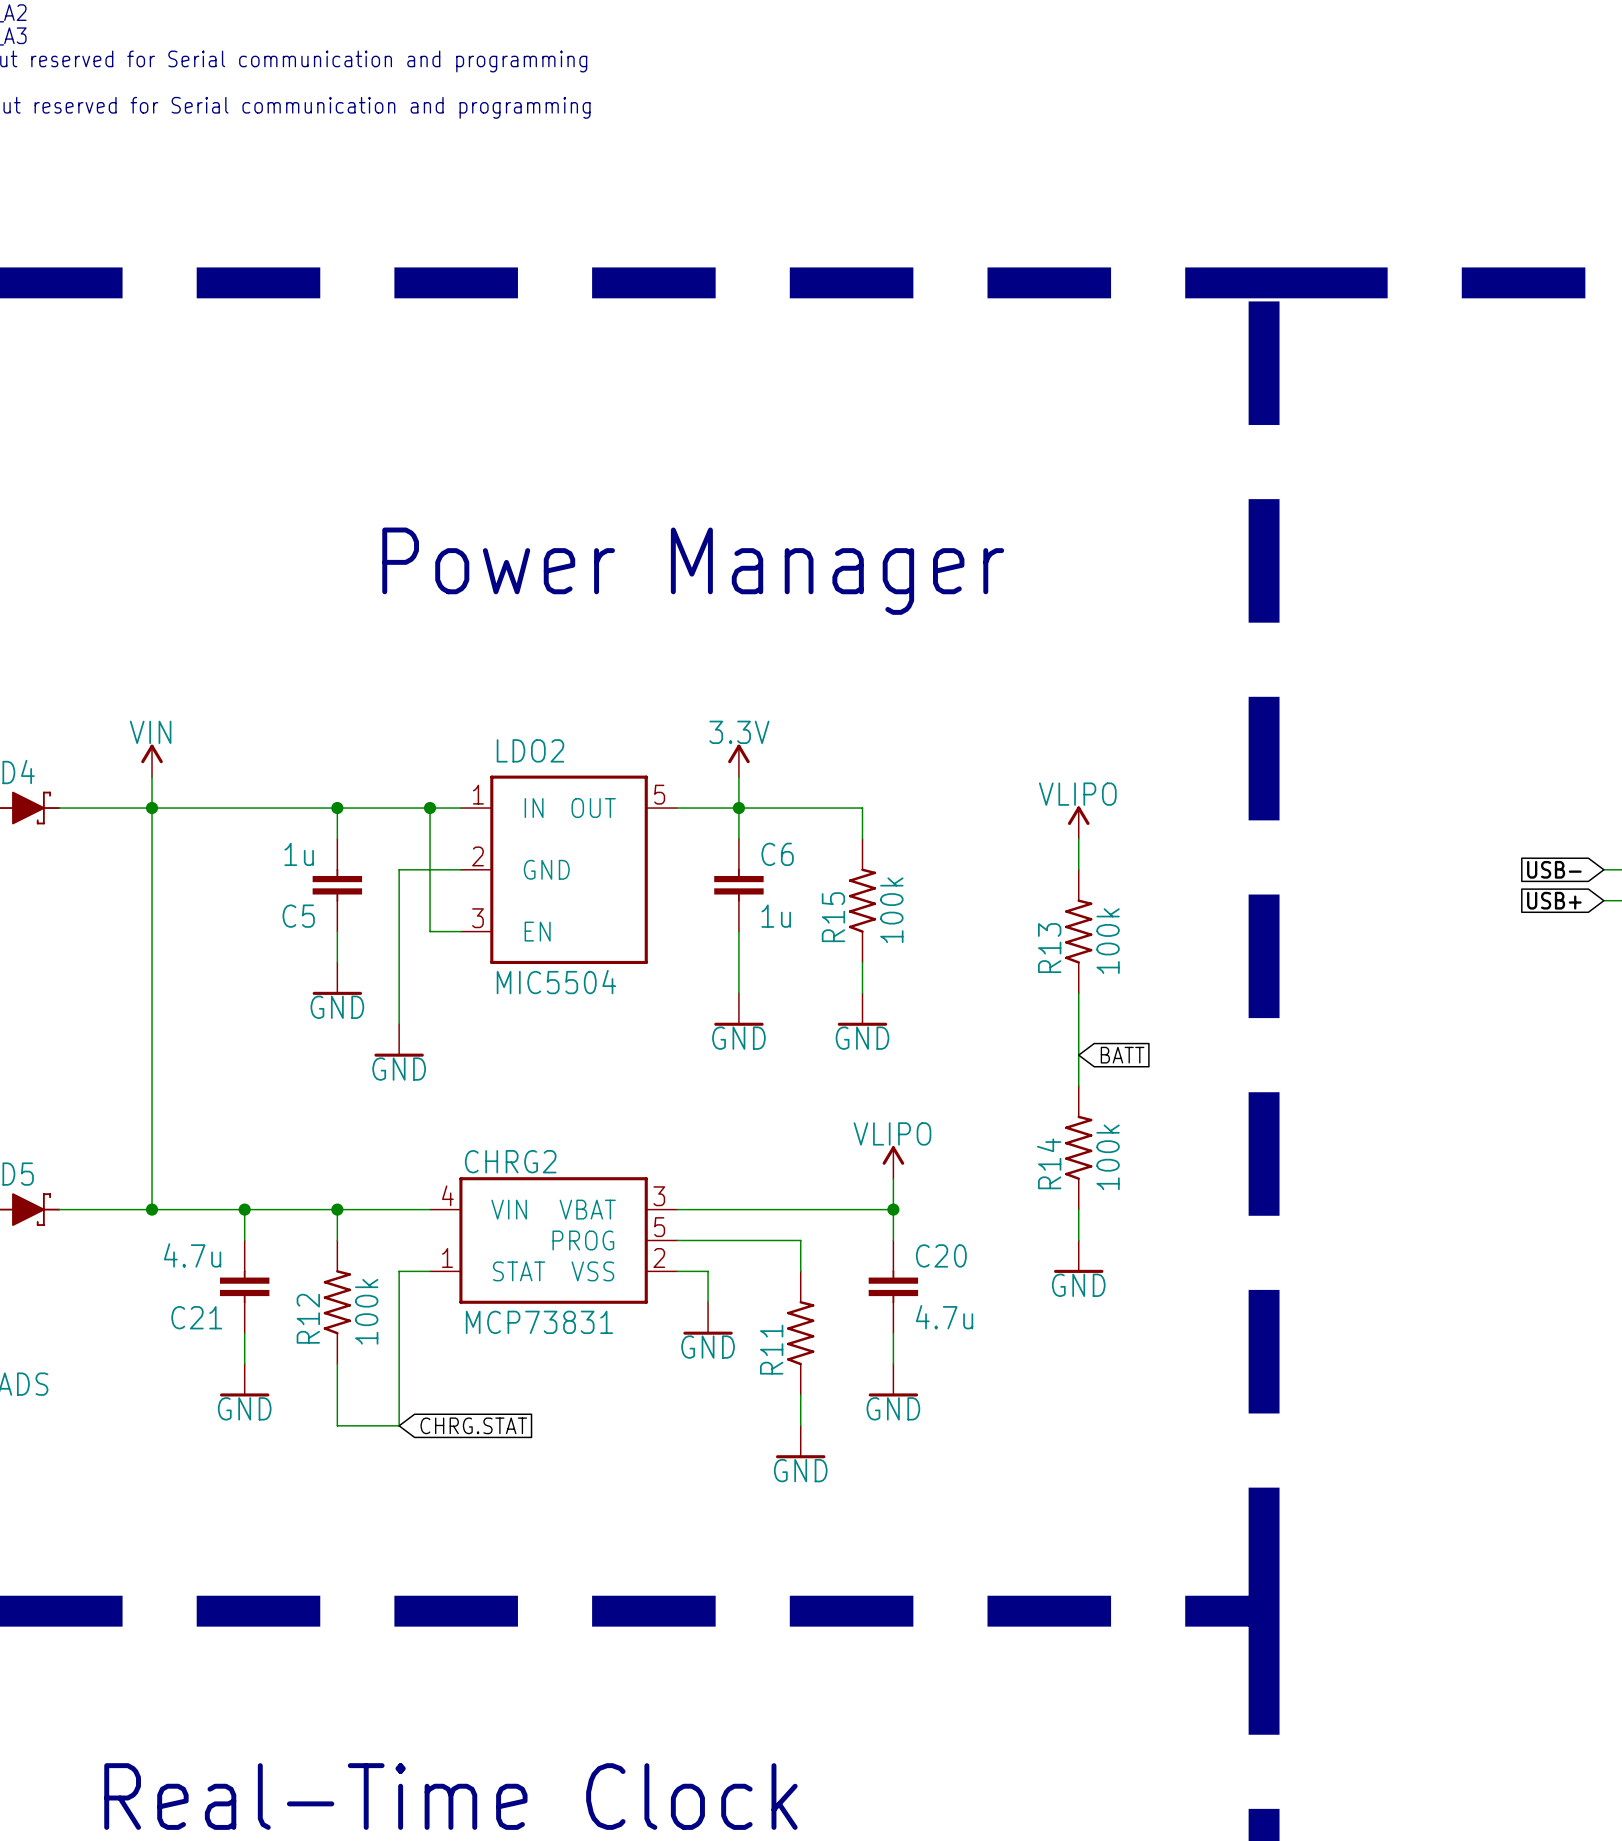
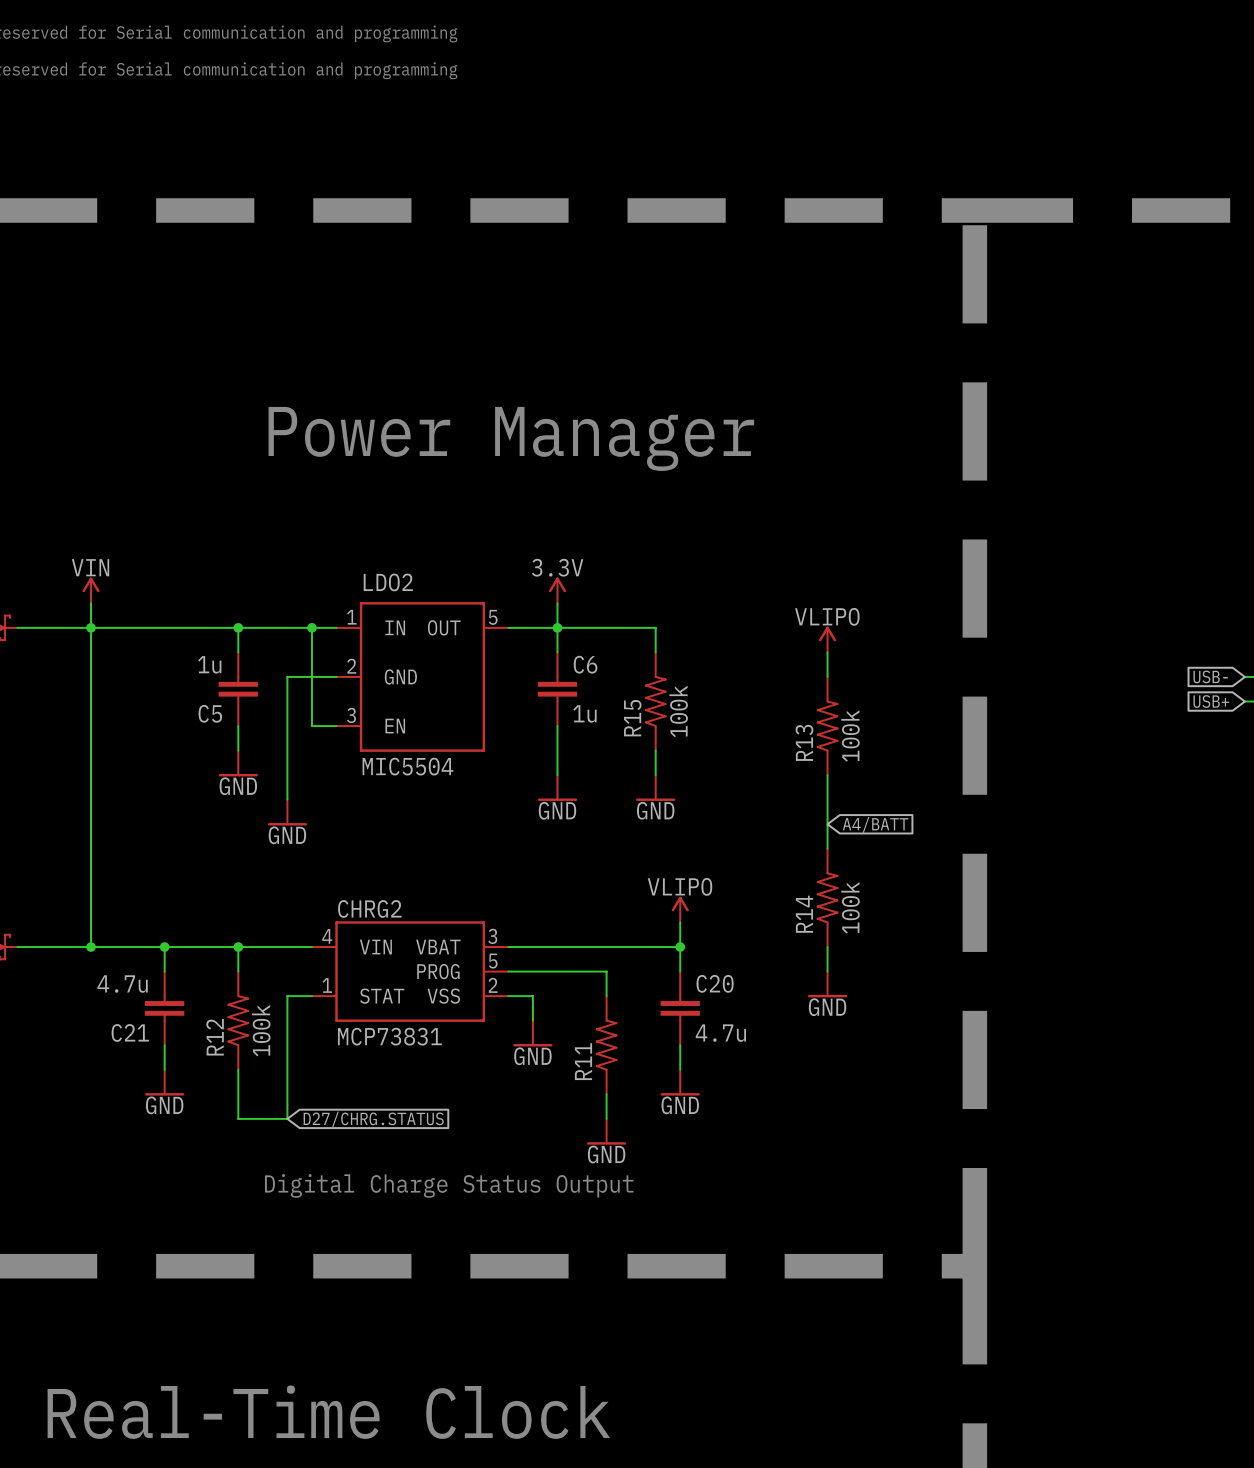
global label: BATT (1122, 1055) -> A4/BATT (875, 824)
global label: CHRG.STAT (473, 1425) -> D27/CHRG.STATUS (373, 1119)
text: none -> Digital Charge Status Output (449, 1185)

